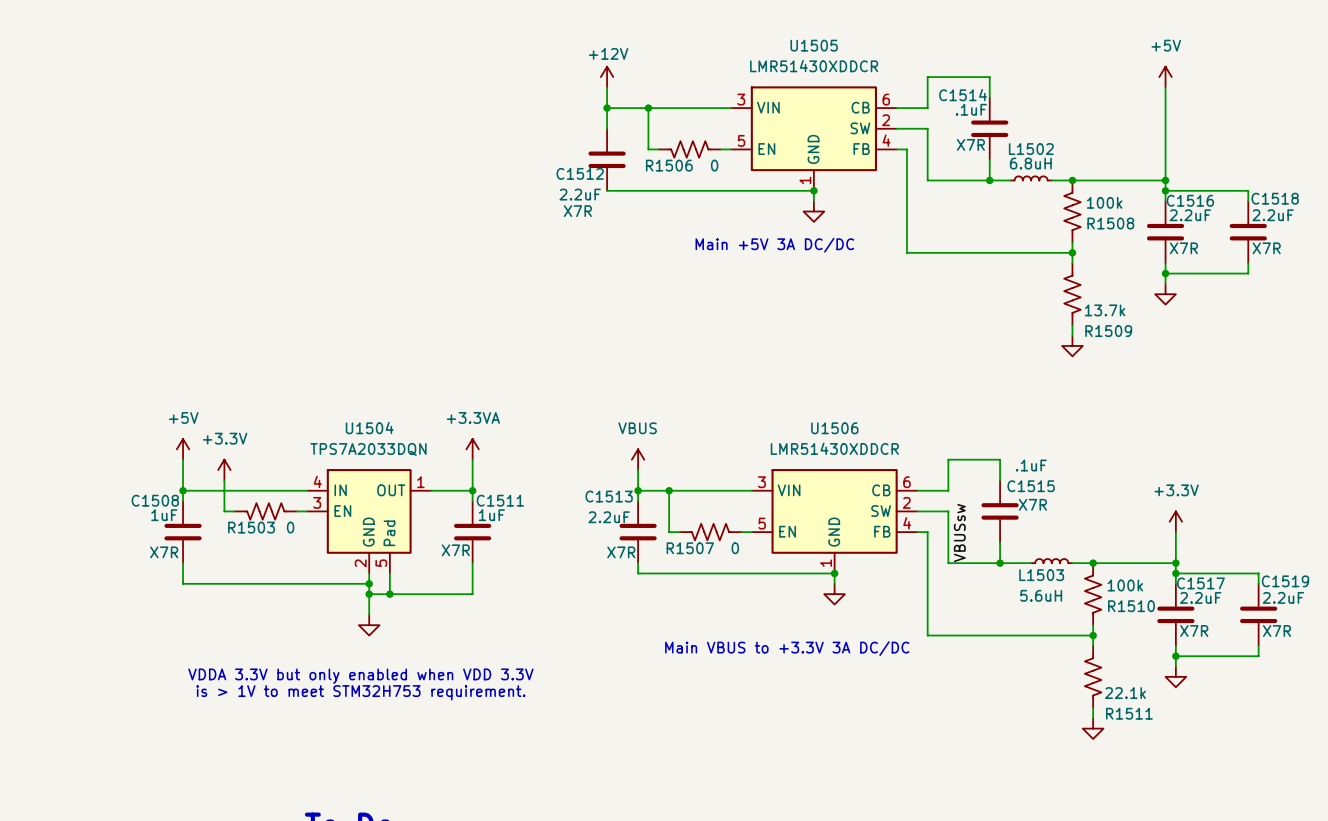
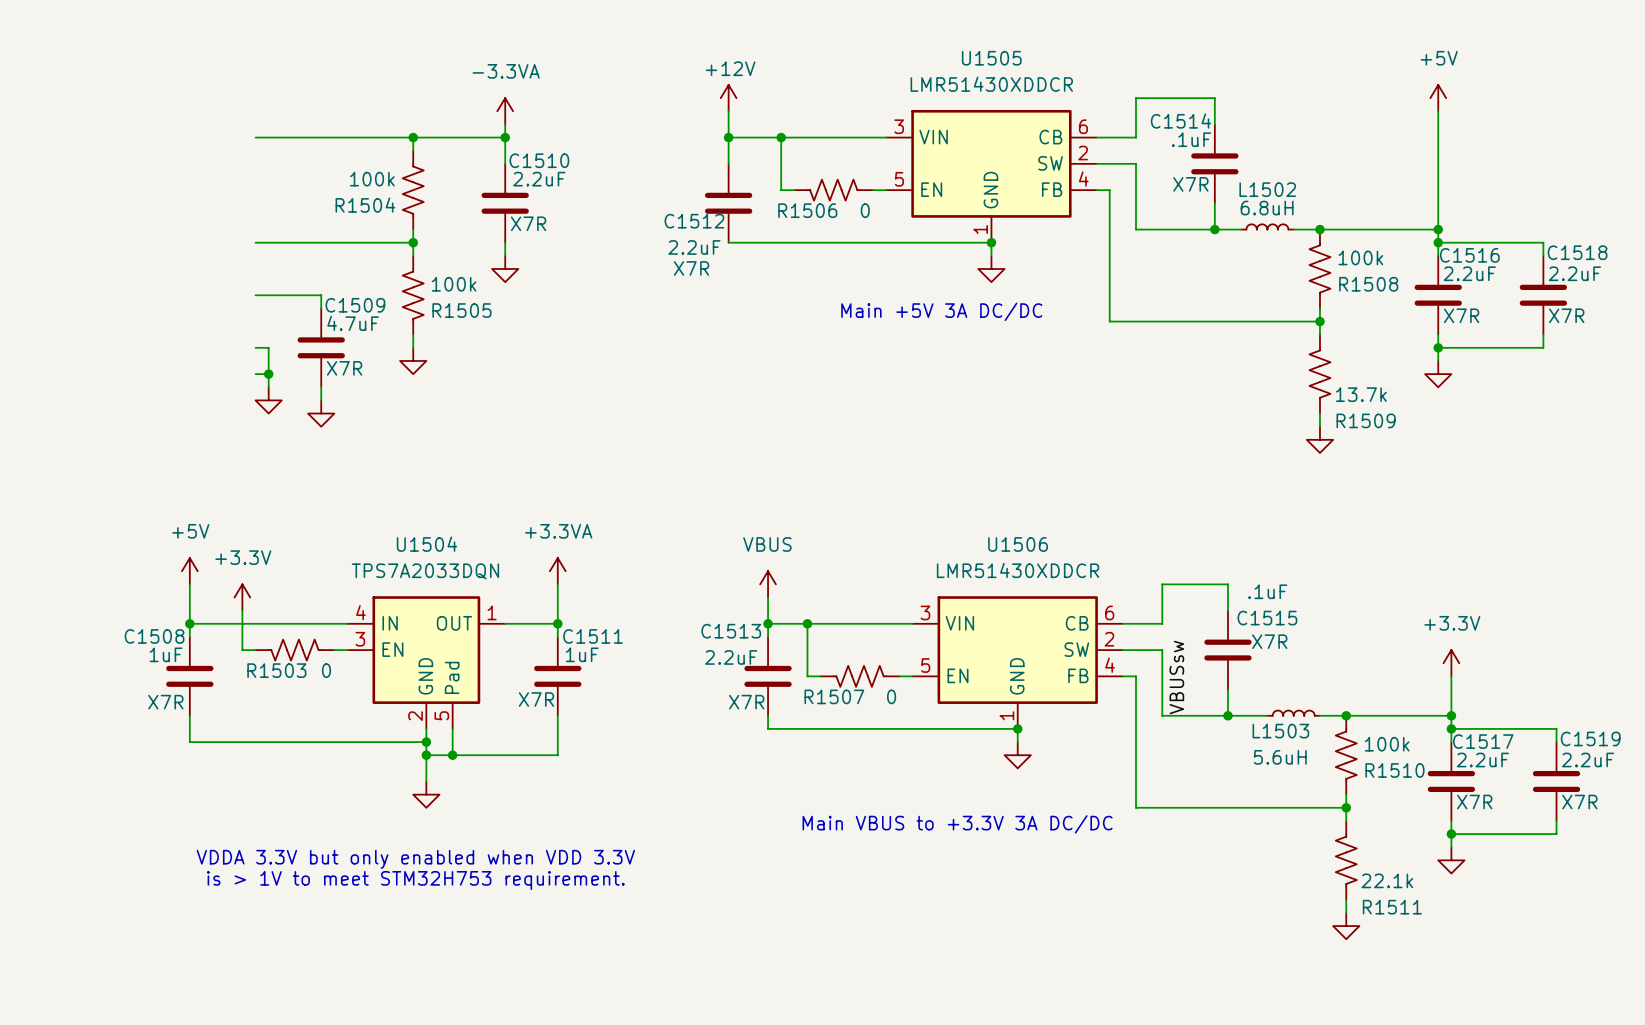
power symbol: none -> -3.3VA (505, 111)
wire: none -> (505, 124) (505, 163)
wire: none -> (255, 137) (505, 137)
wire: none -> (413, 137) (413, 150)
junction: none -> (413, 137)
junction: none -> (505, 137)
R1504: none -> 100k (413, 190)
C1510: none -> 2.2uF (505, 203)
wire: none -> (413, 229) (413, 255)
wire: none -> (255, 242) (413, 242)
junction: none -> (413, 242)
wire: none -> (505, 242) (505, 255)
power symbol: none -> (505, 268)
wire: none -> (255, 295) (321, 295) (321, 308)
R1505: none -> 100k (413, 295)
wire: none -> (413, 334) (413, 347)
wire: none -> (255, 347) (268, 347) (268, 387)
C1509: none -> 4.7uF (321, 347)
power symbol: none -> (413, 360)
wire: none -> (255, 374) (268, 374)
junction: none -> (268, 374)
wire: none -> (321, 387) (321, 400)
power symbol: none -> (268, 400)
power symbol: none -> (321, 413)

